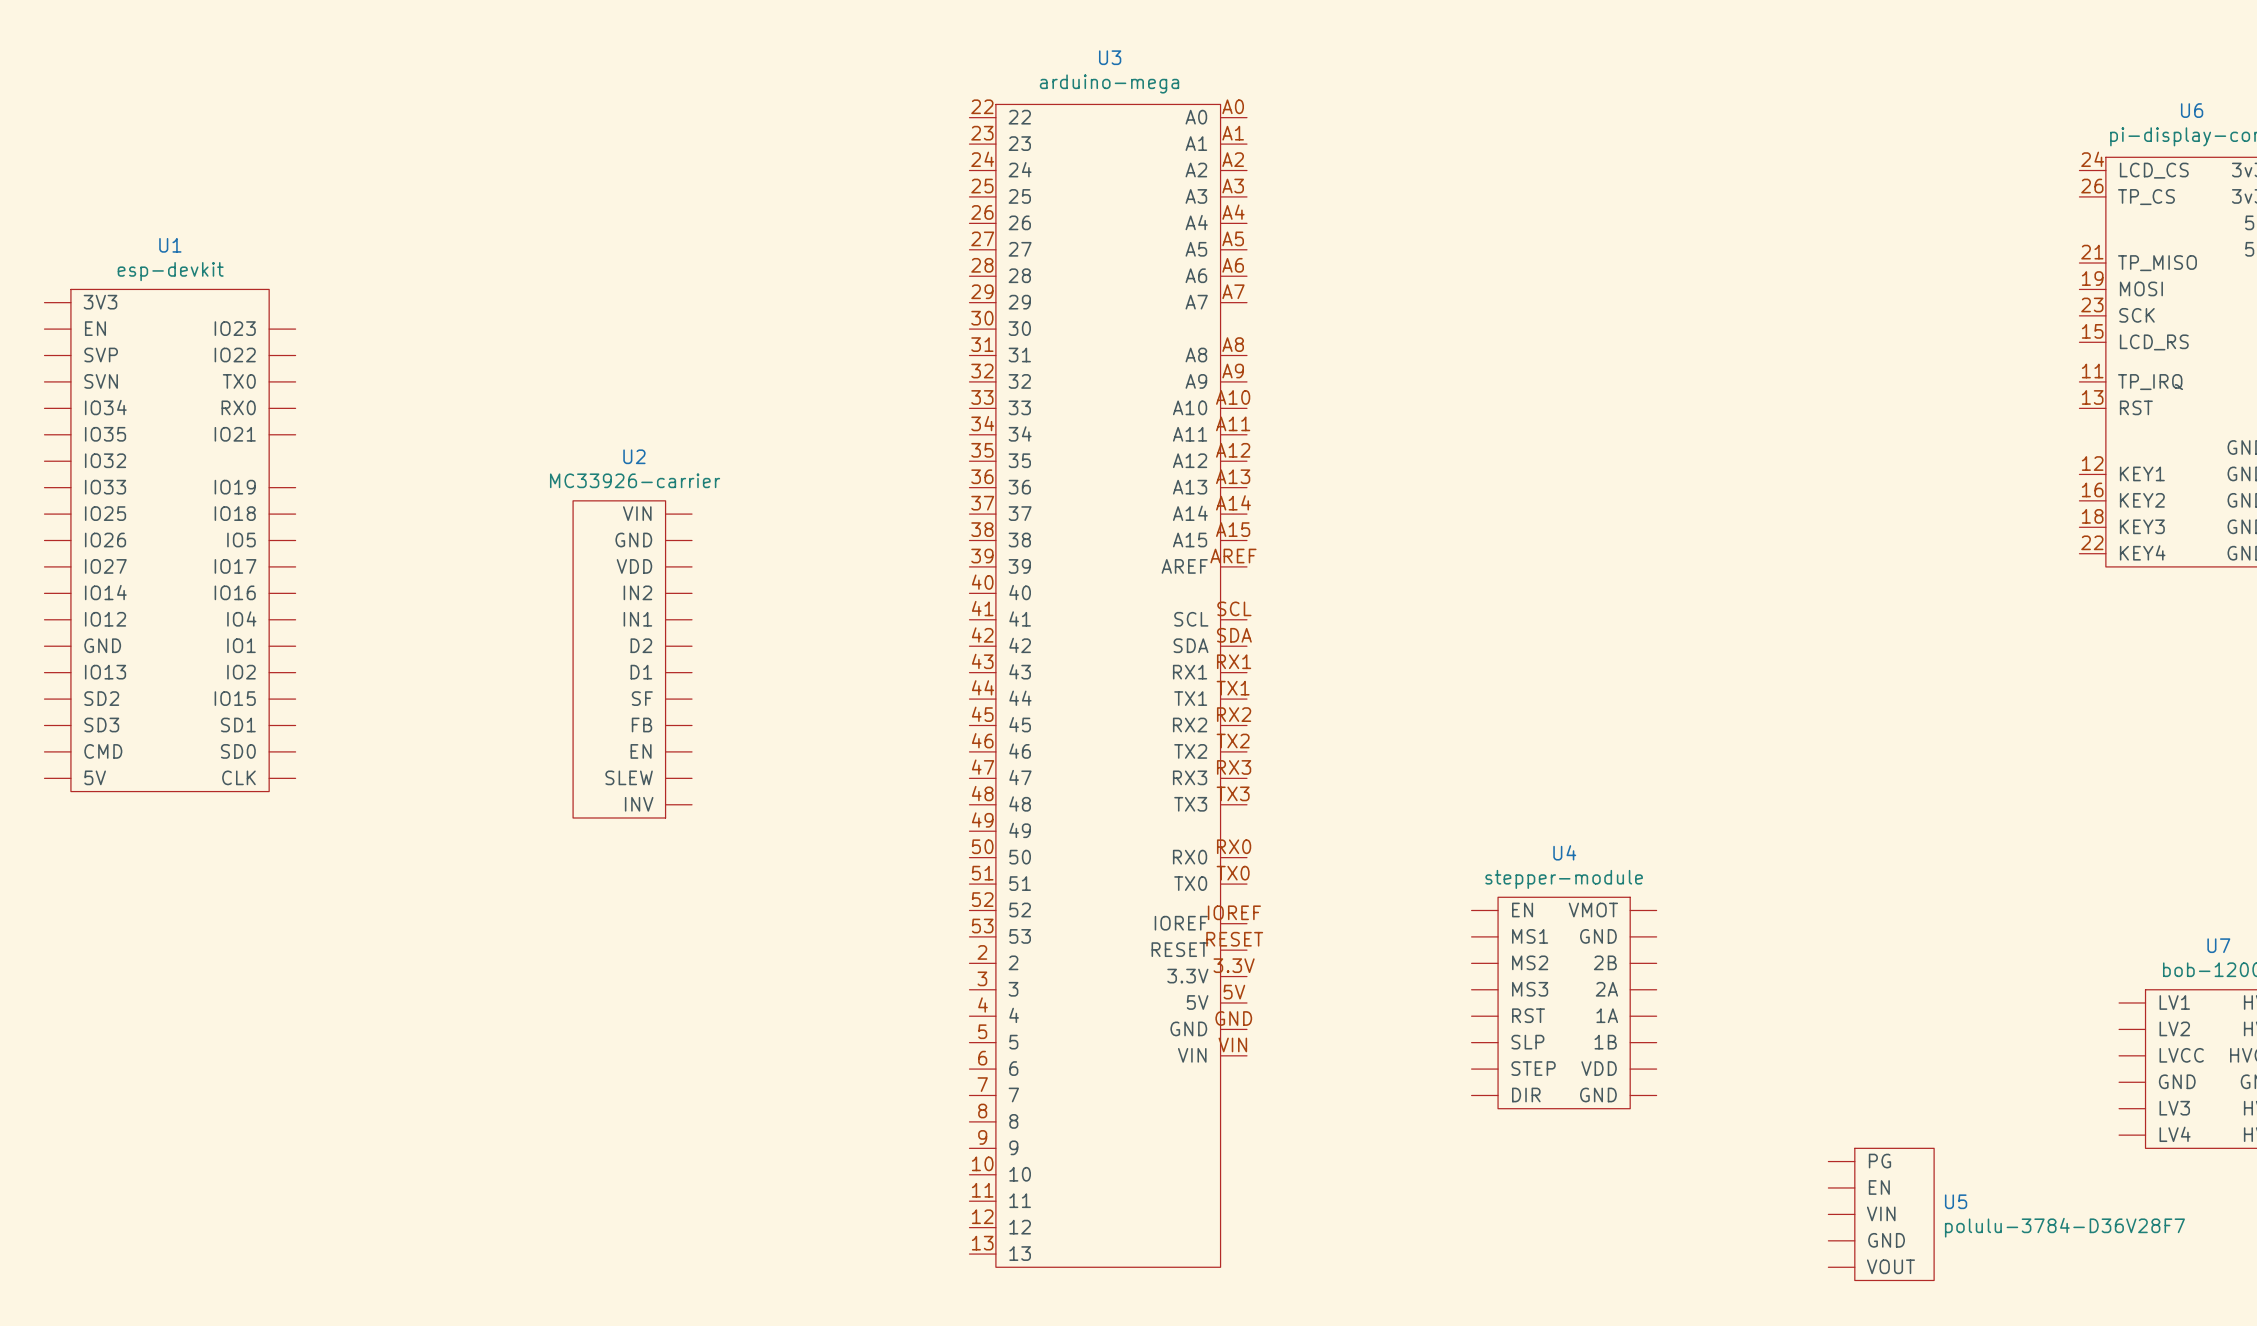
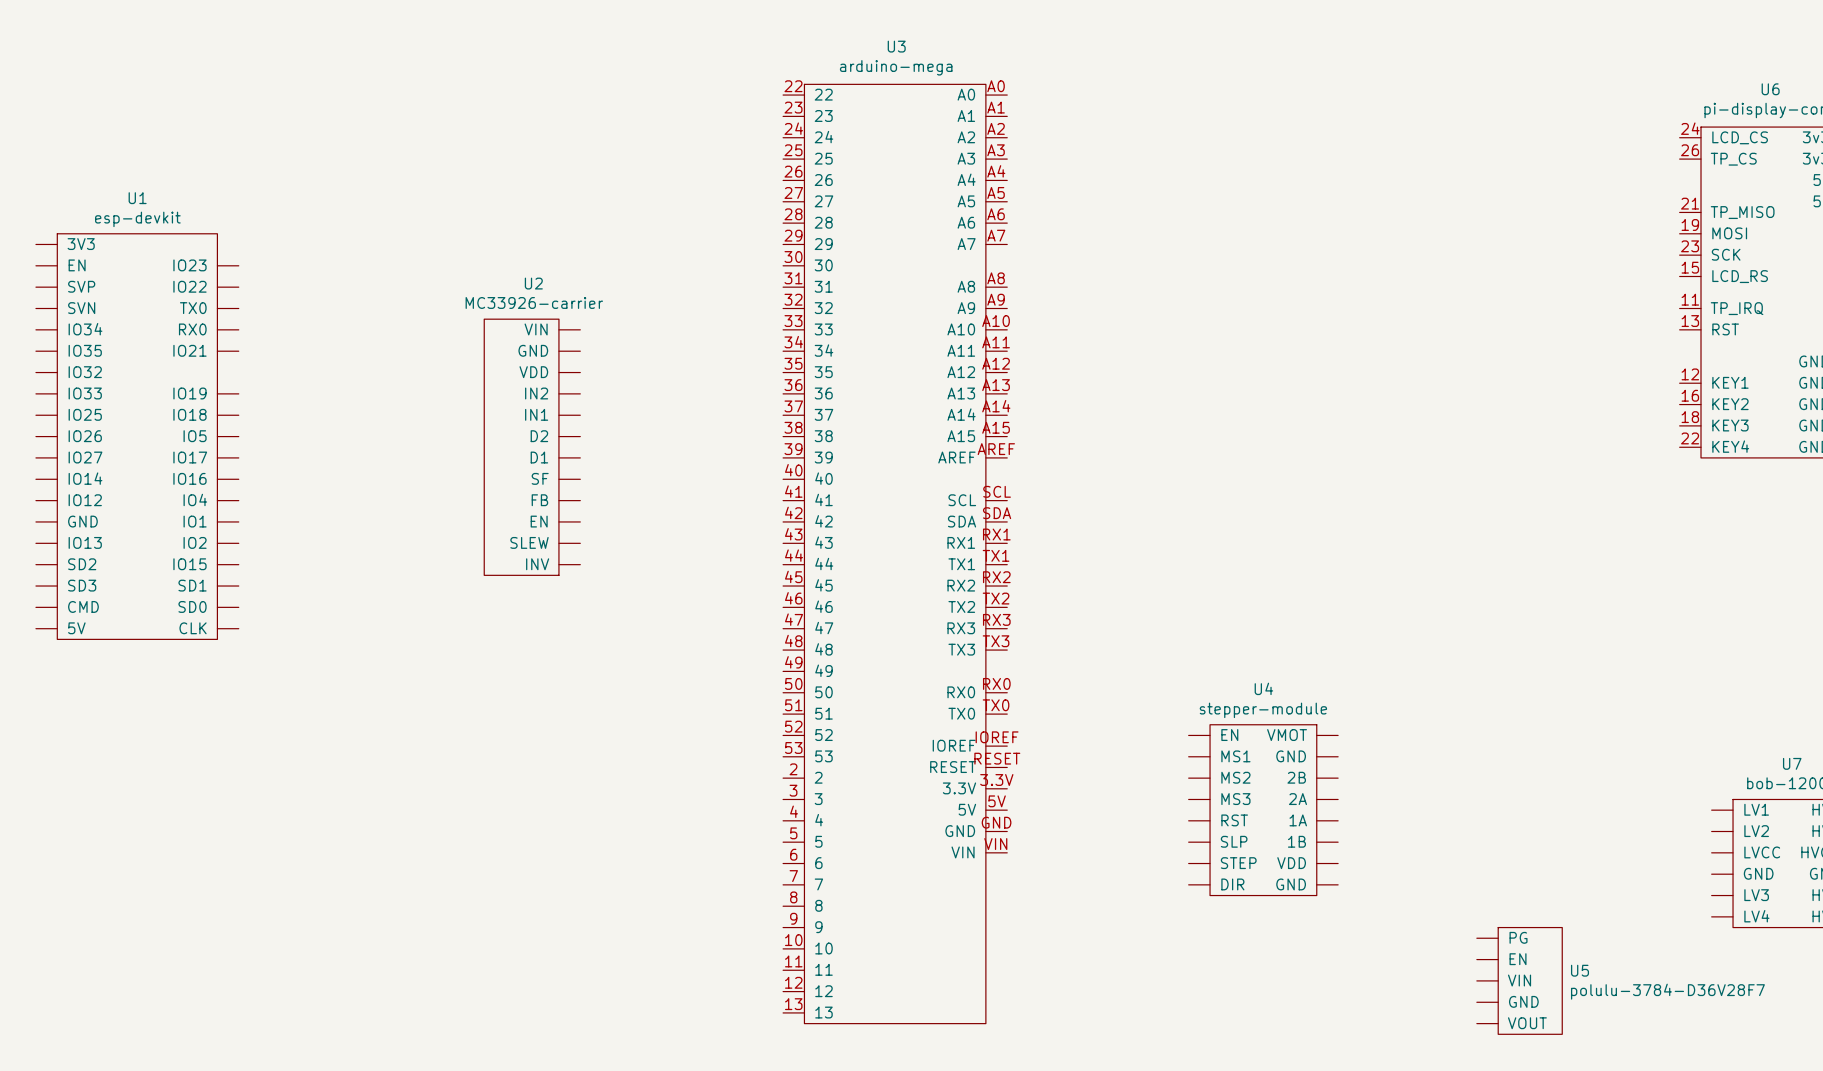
U2 position: (632, 659) -> (532, 447)

